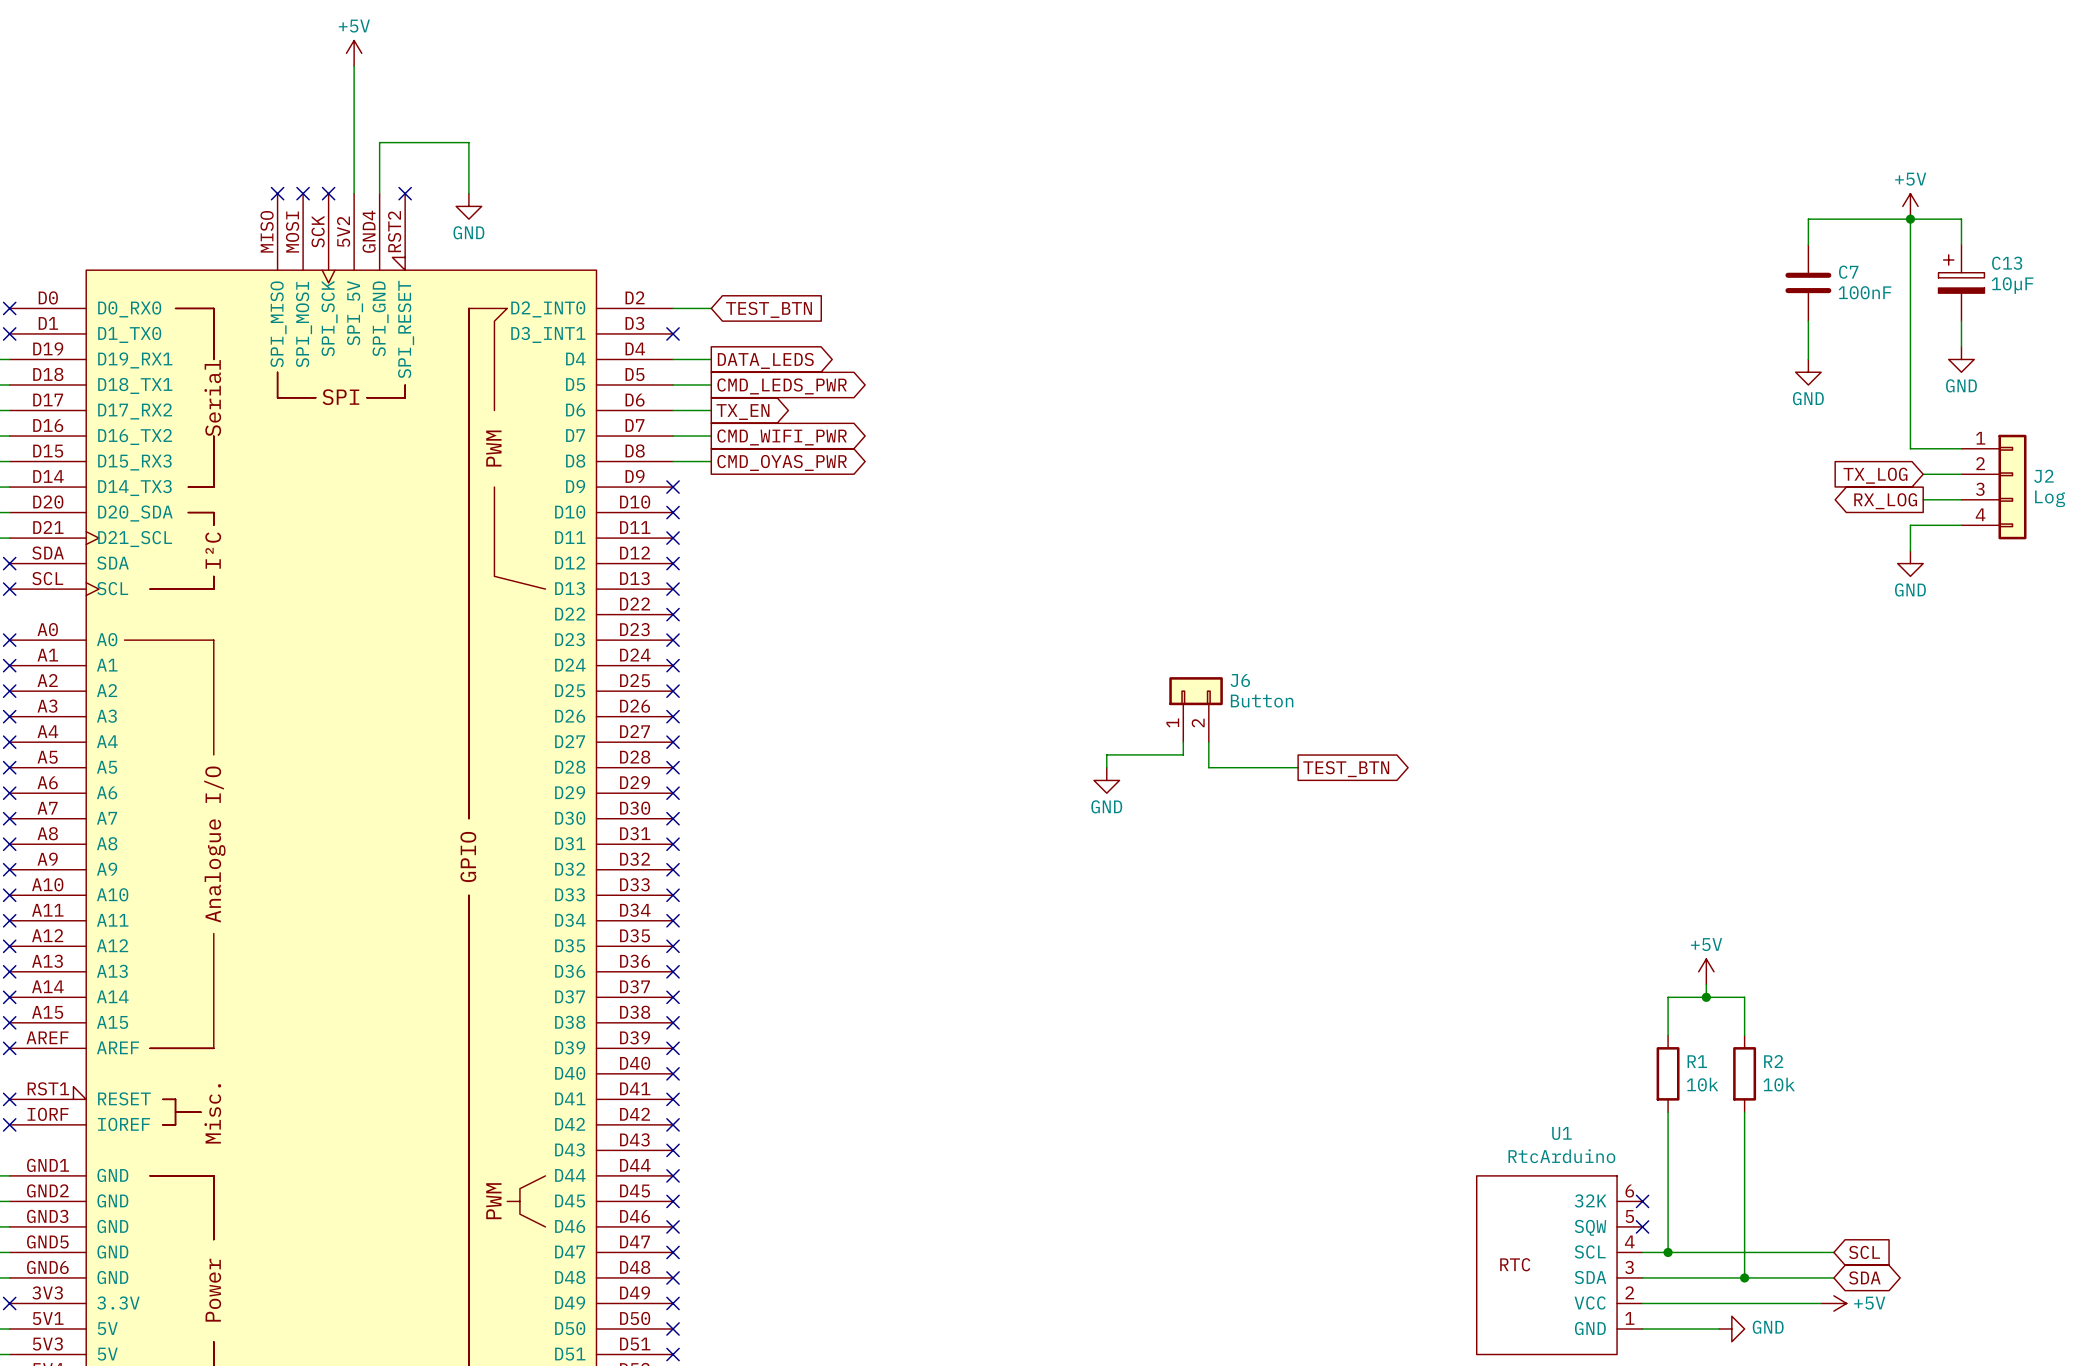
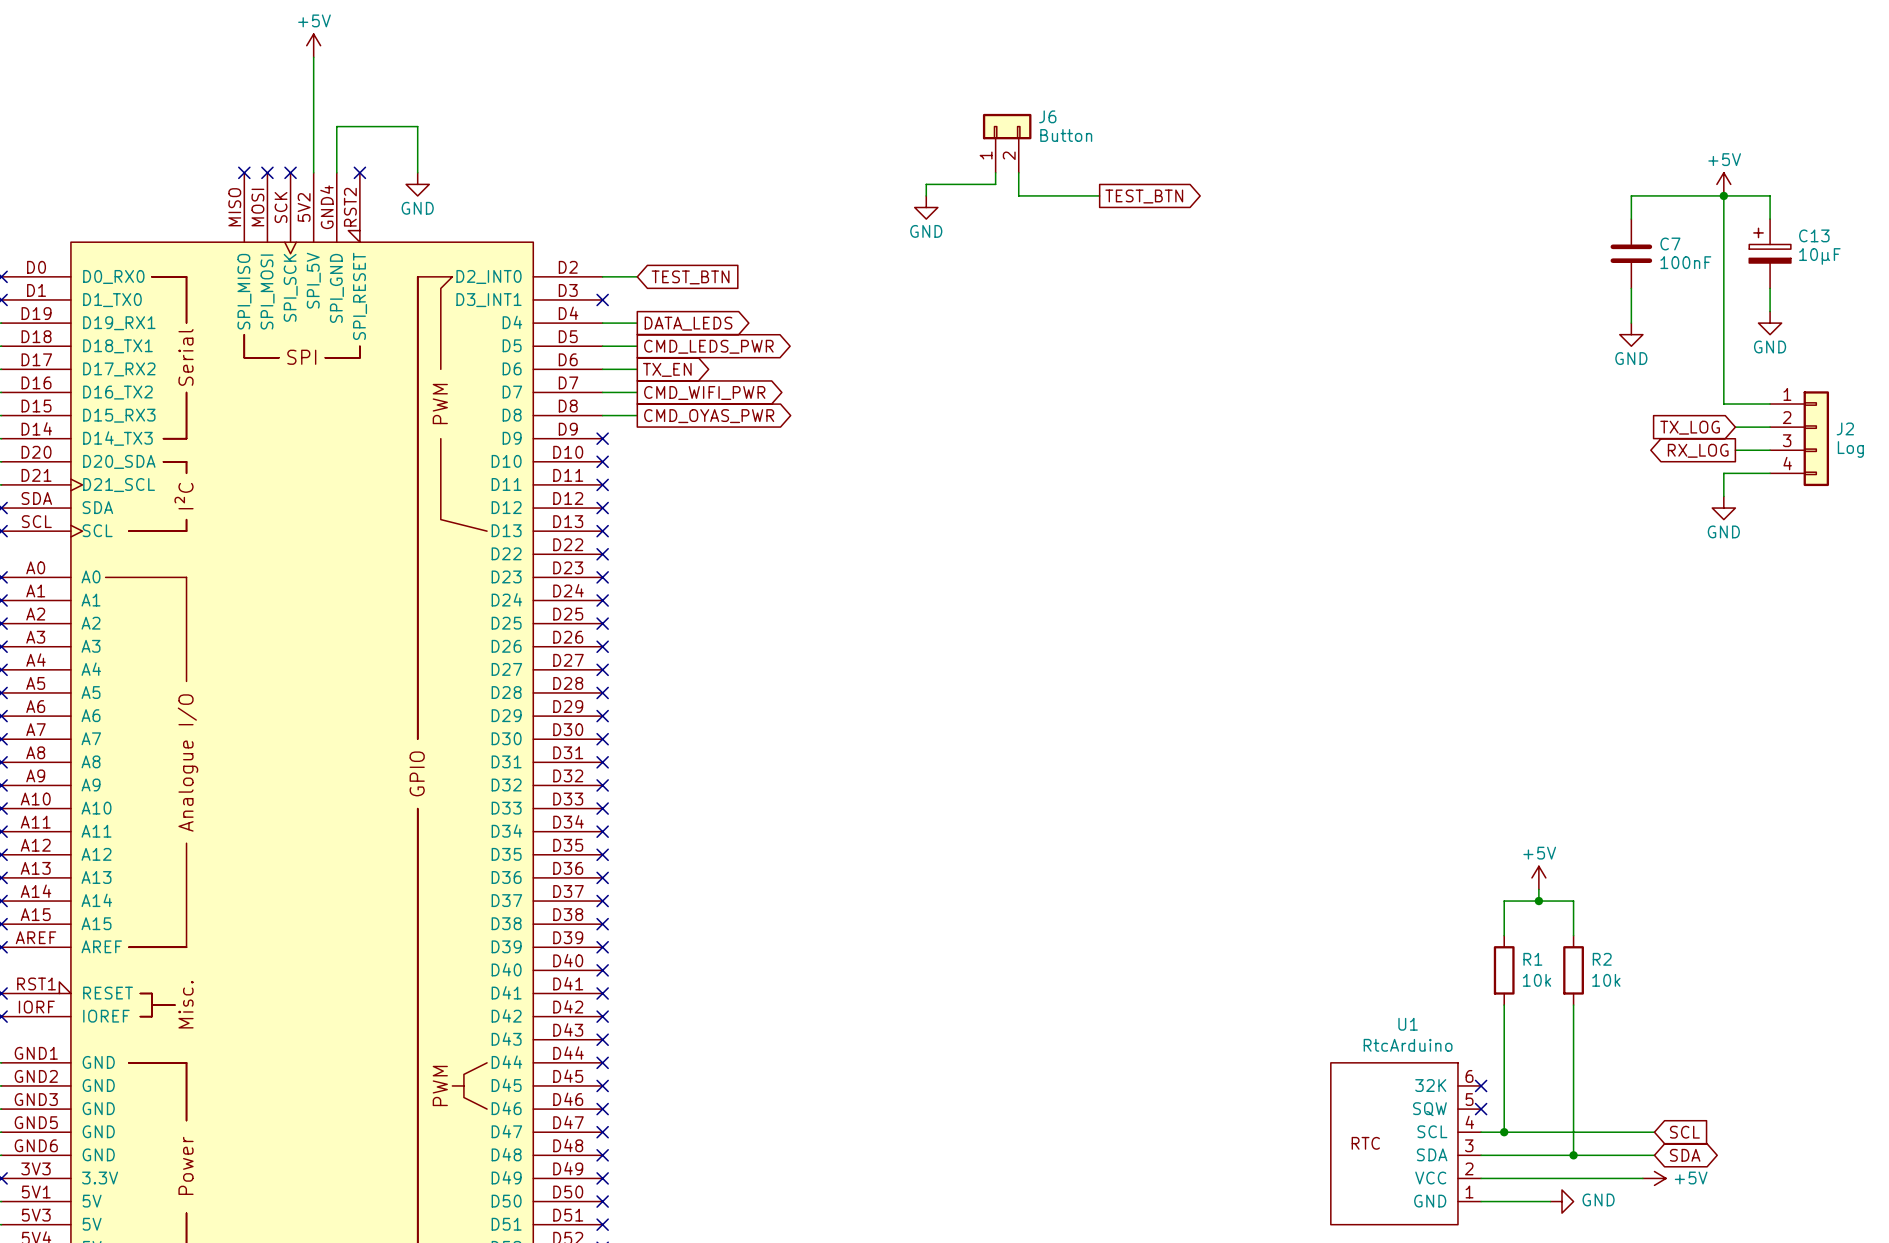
wire: none -> (995, 172) (995, 184) (926, 184) (926, 195)
wire: none -> (1018, 172) (1018, 195) (1099, 195)
global label: none -> TEST_BTN (1144, 196)
power symbol: none -> GND (926, 207)
J6 position: (1196, 709) -> (1007, 143)
wire: (1183, 742) (1183, 754) (1106, 754) (1106, 767) -> none
wire: (1208, 742) (1208, 767) (1298, 767) -> none
global label: TEST_BTN (1346, 769) -> none
power symbol: GND (1106, 780) -> none

